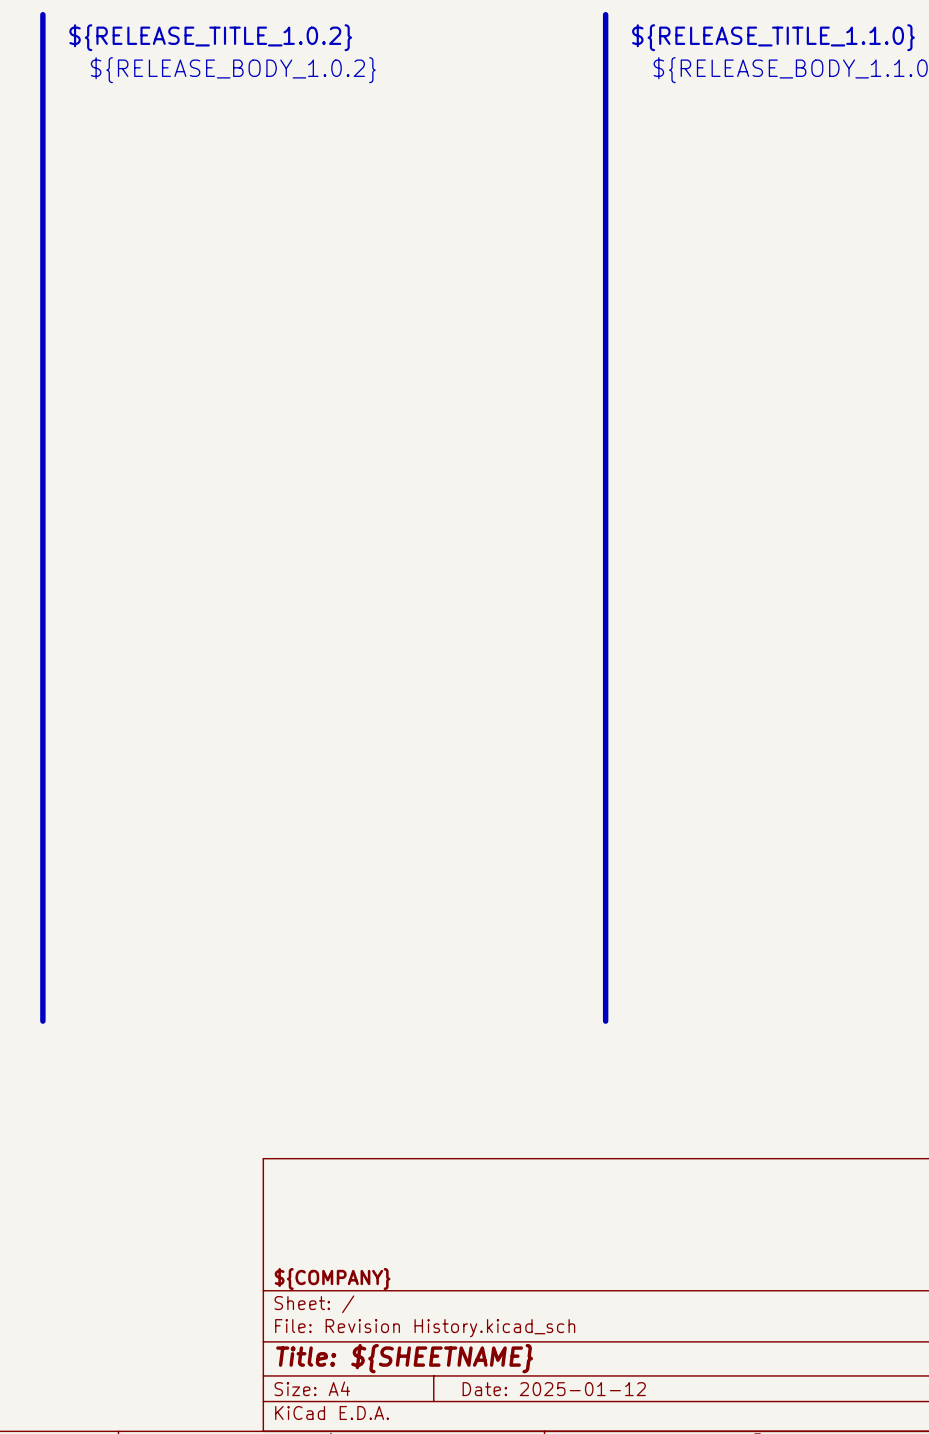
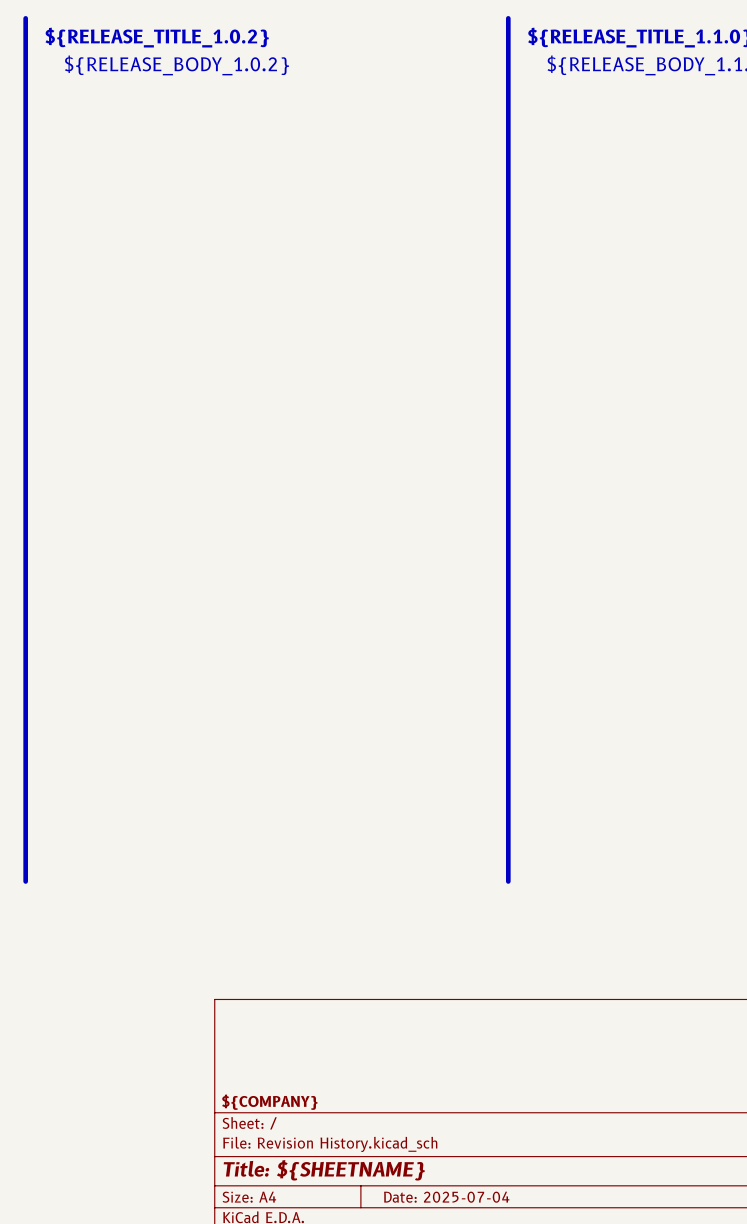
title block: Date: 2025-01-12 (554, 1389) -> Date: 2025-07-04 (446, 1197)

